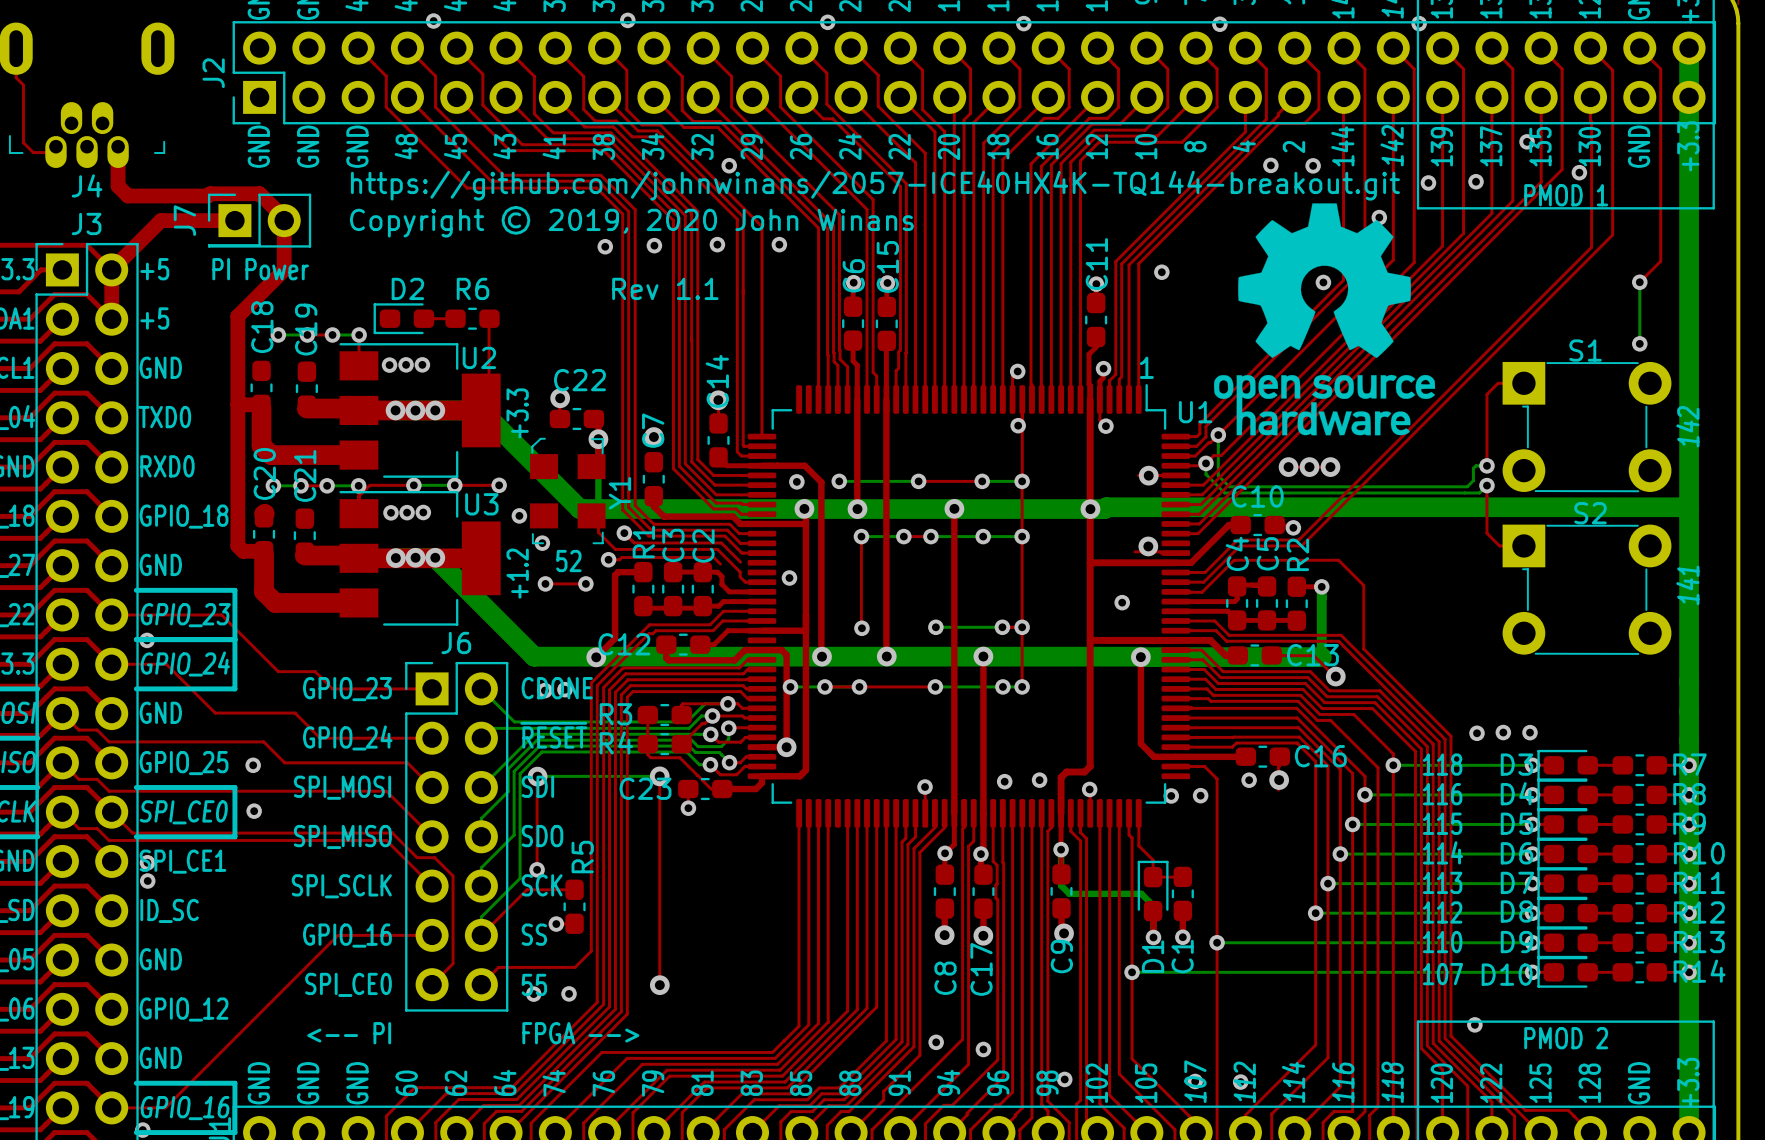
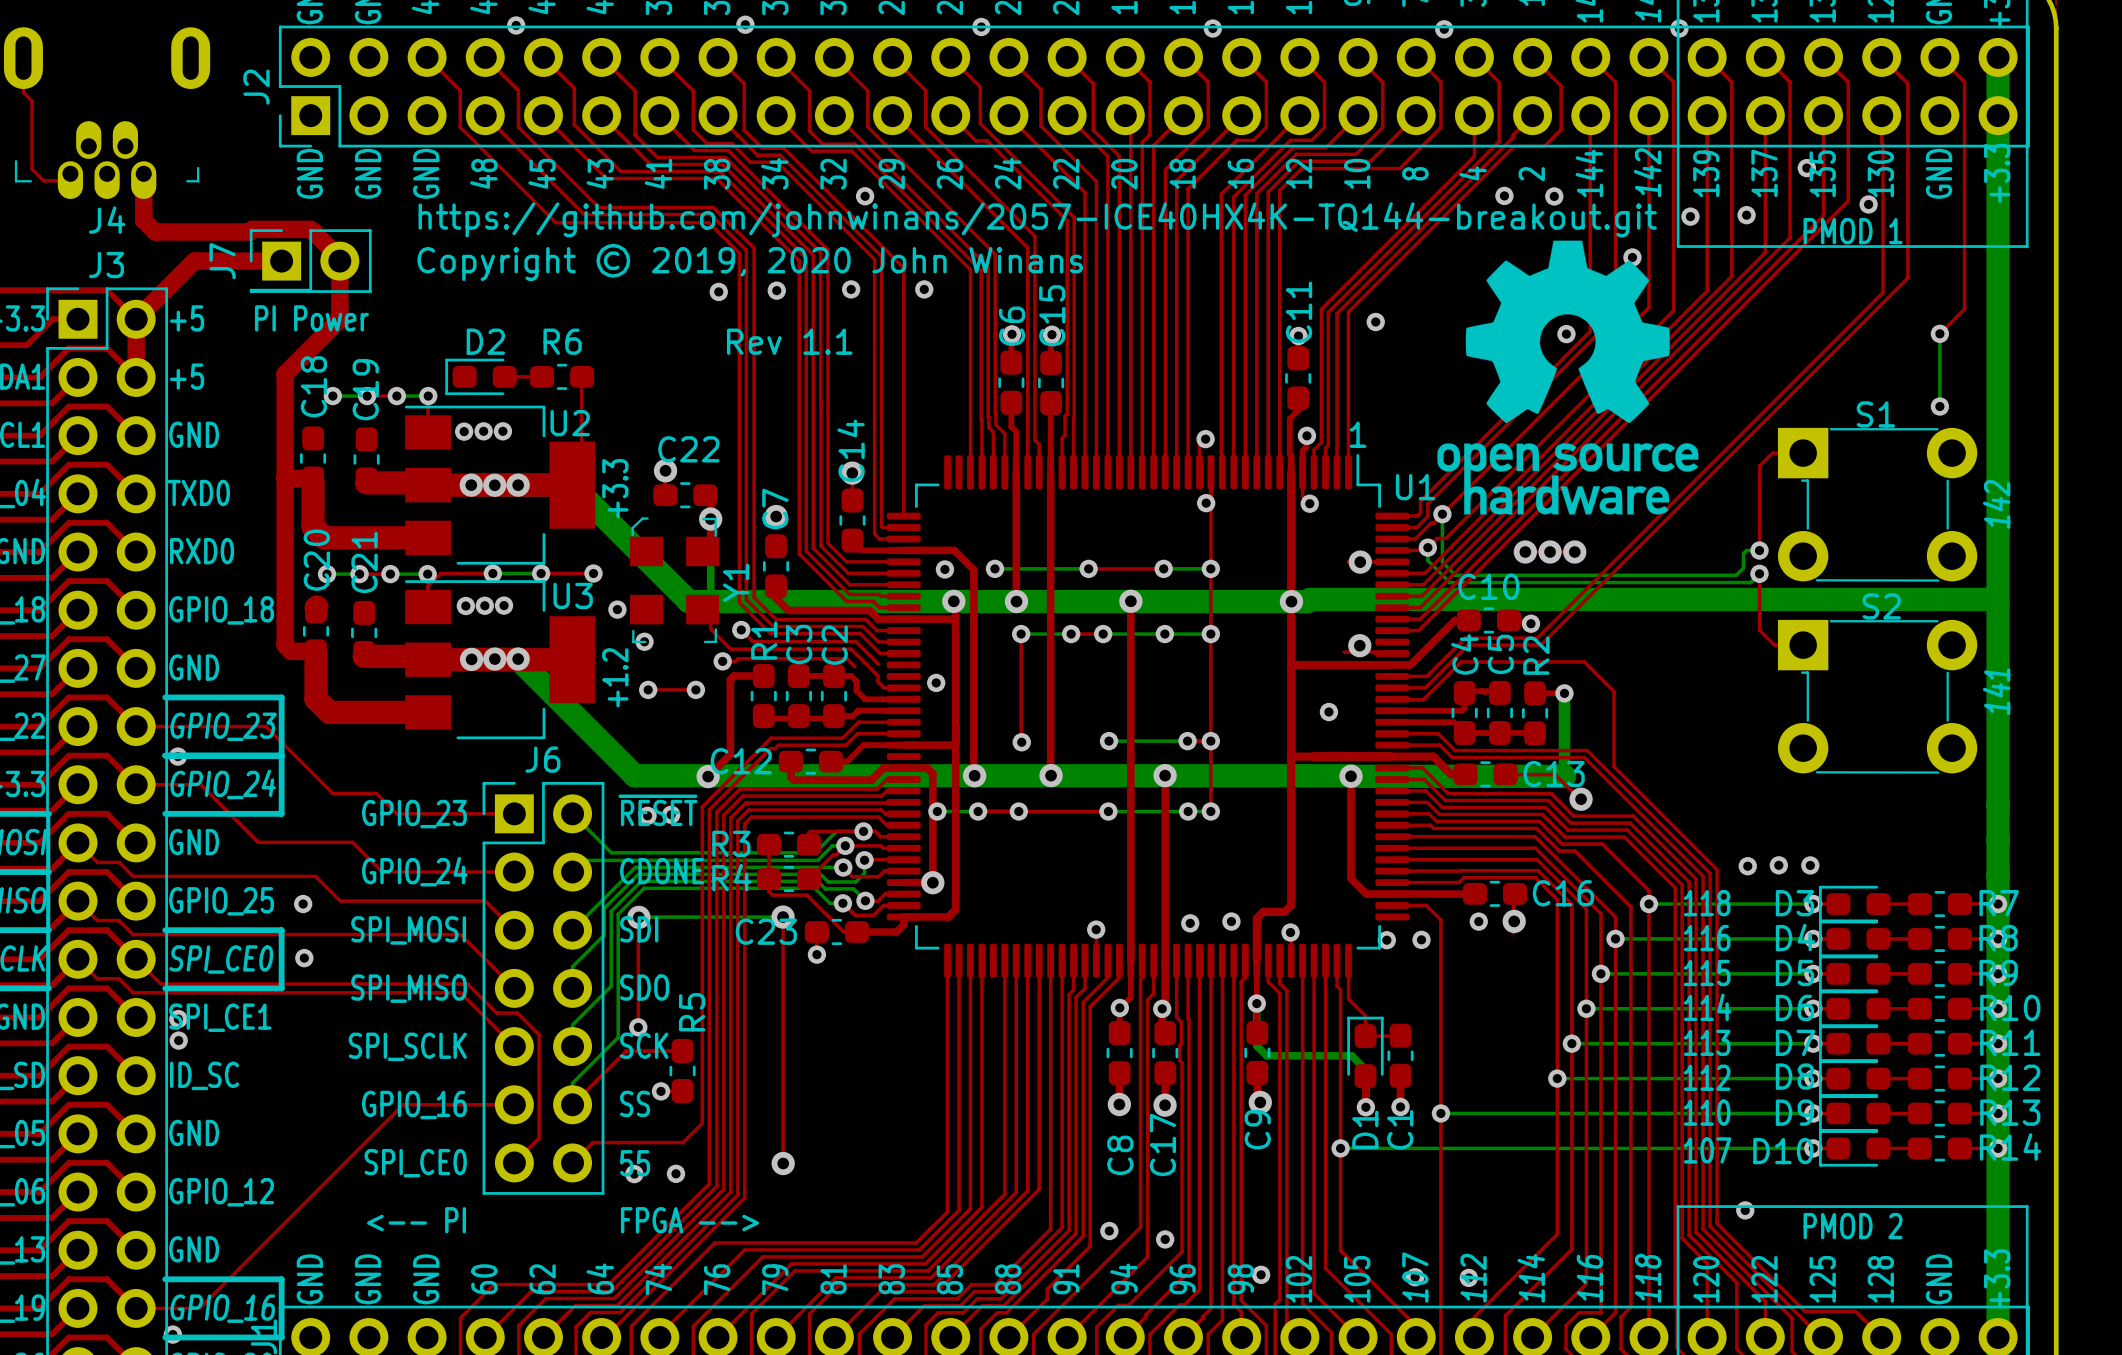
text: 52 (568, 561) -> none
text: CDONE (557, 688) -> ~{RESET} (657, 810)
text: ~{RESET} (553, 735) -> CDONE (662, 871)

